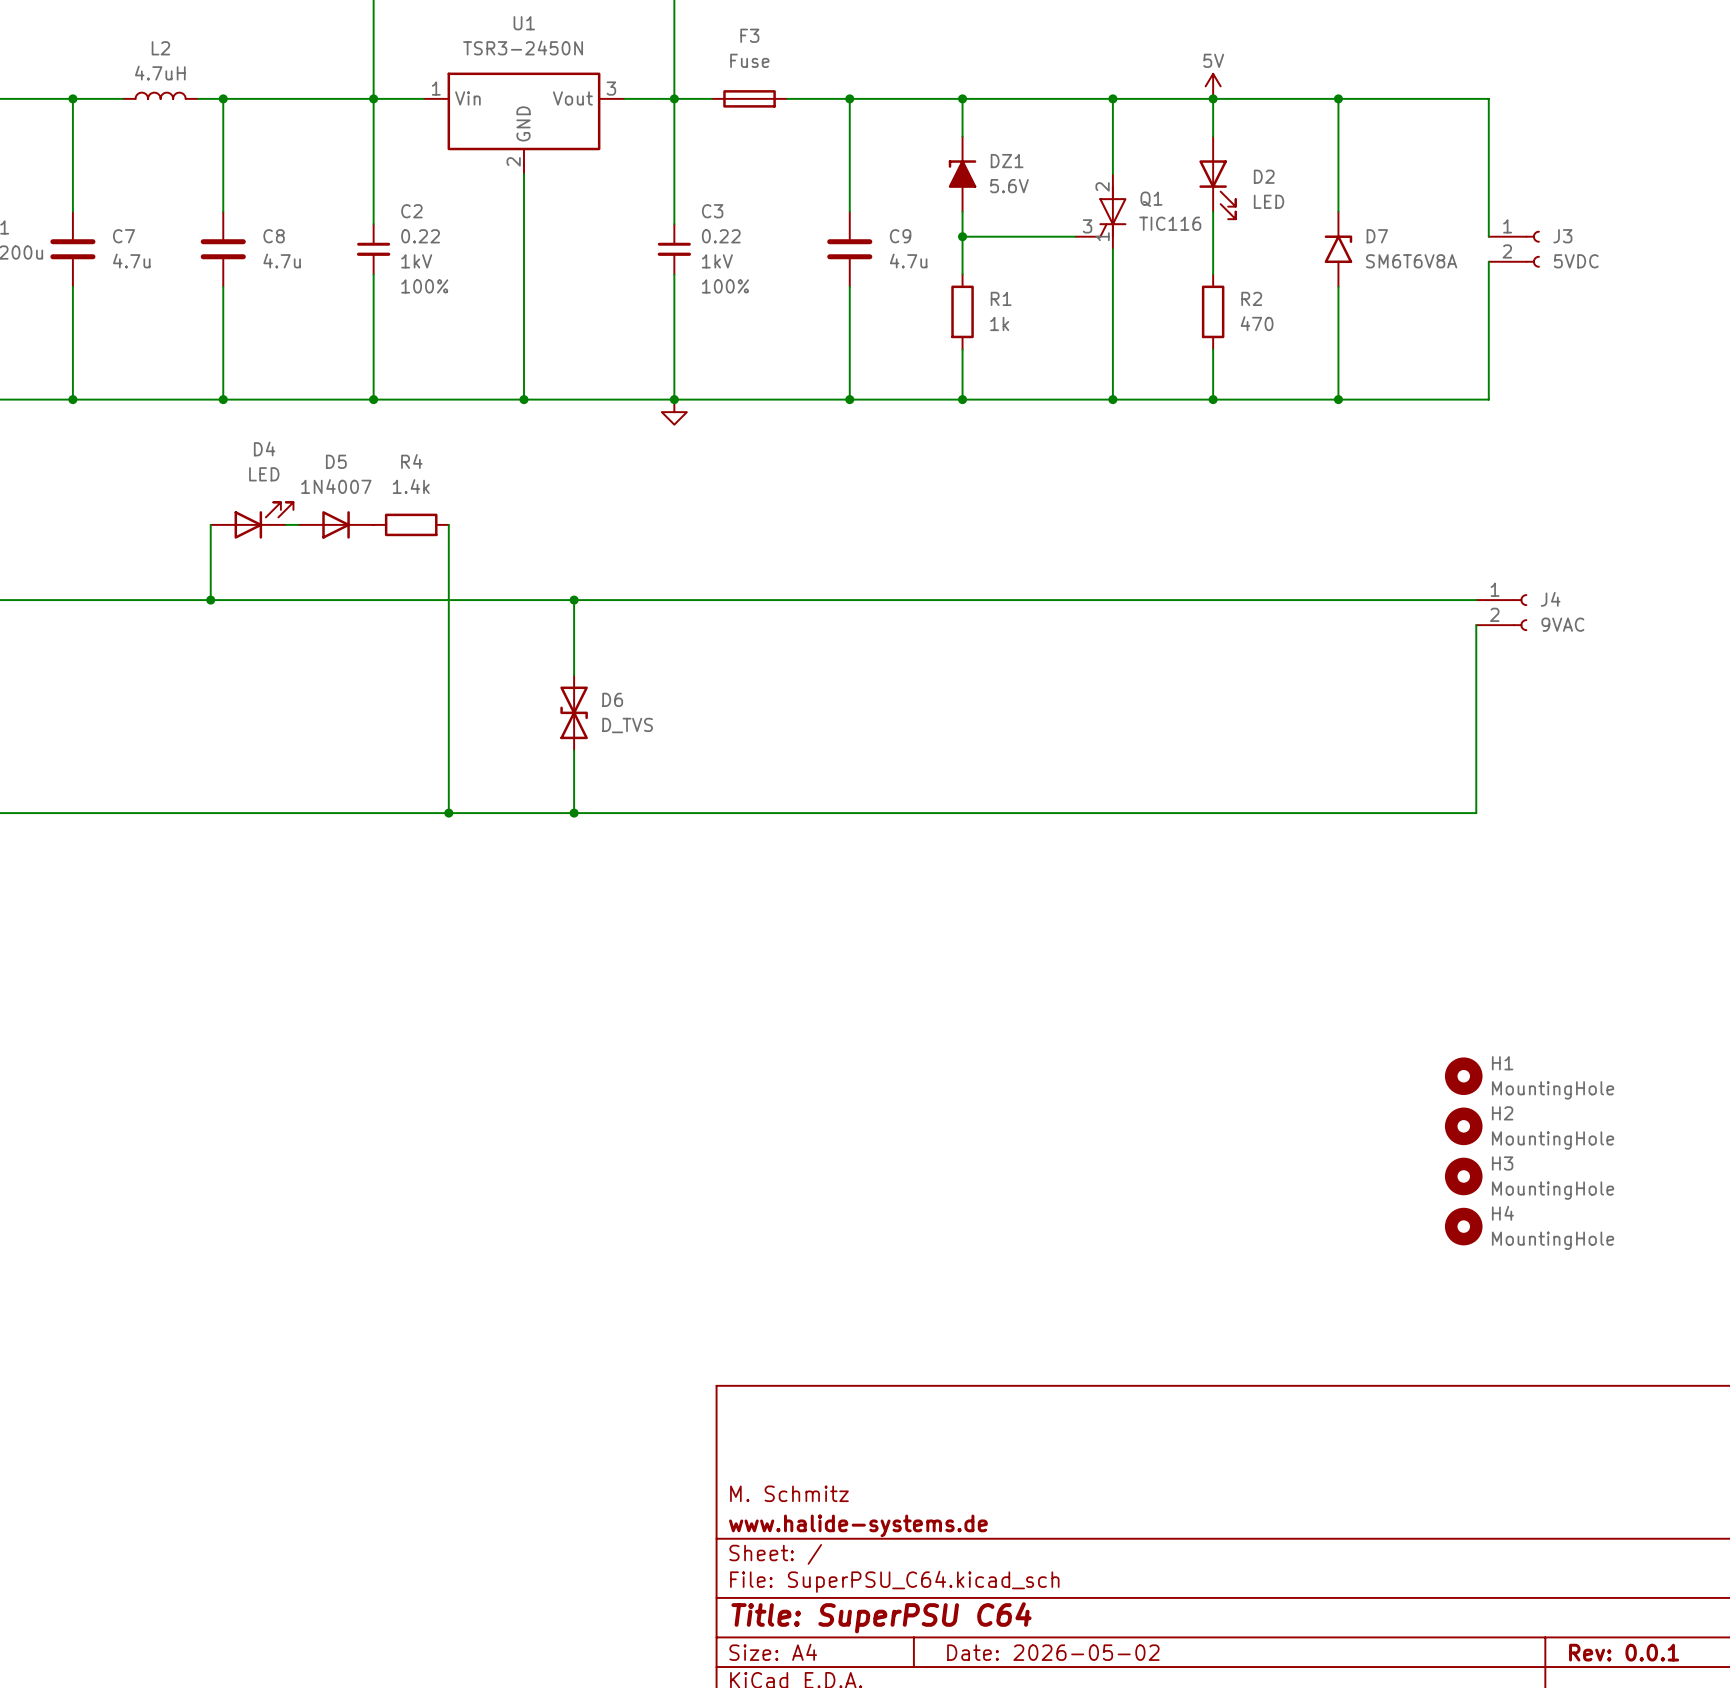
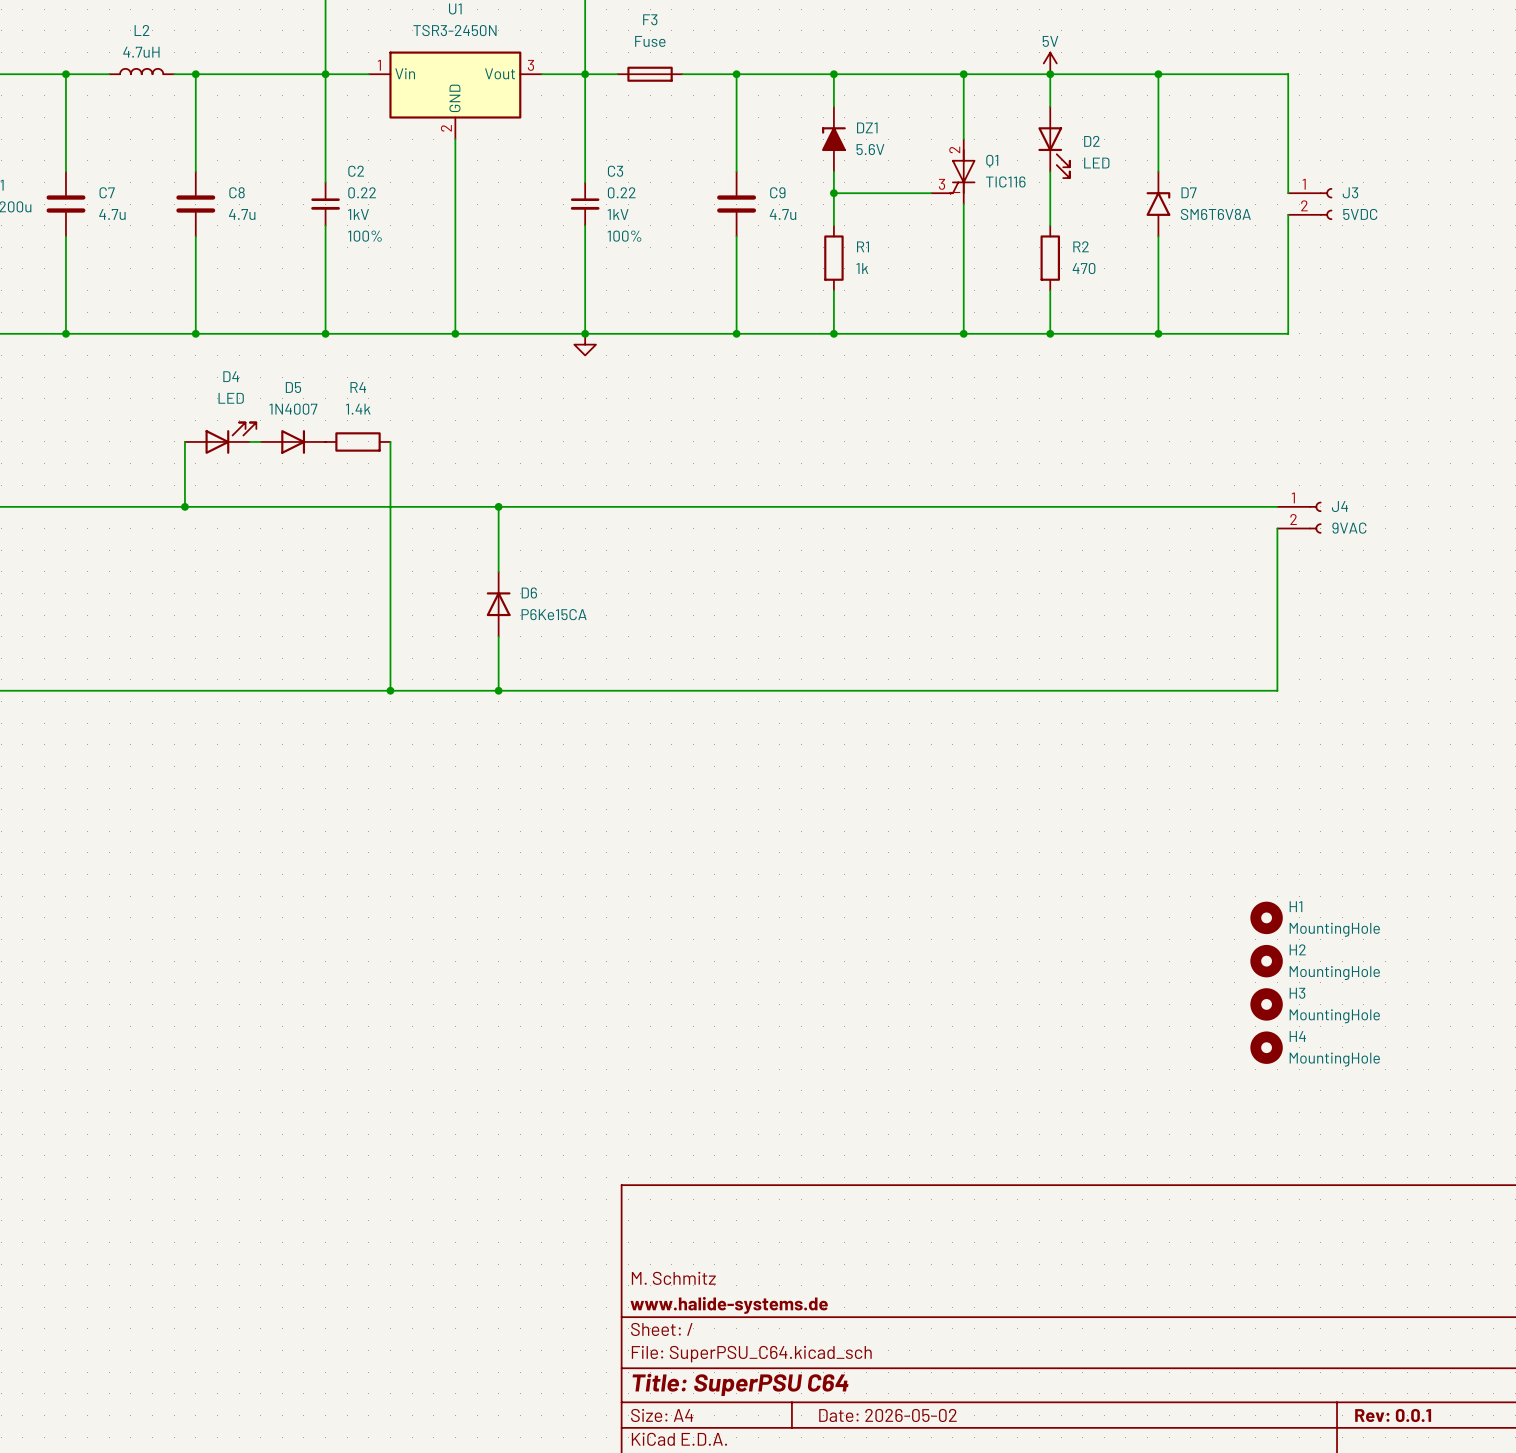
D6 symbol: [560, 675, 588, 751] -> [486, 571, 511, 637]
D6 value: D_TVS (627, 725) -> P6Ke15CA (554, 614)

